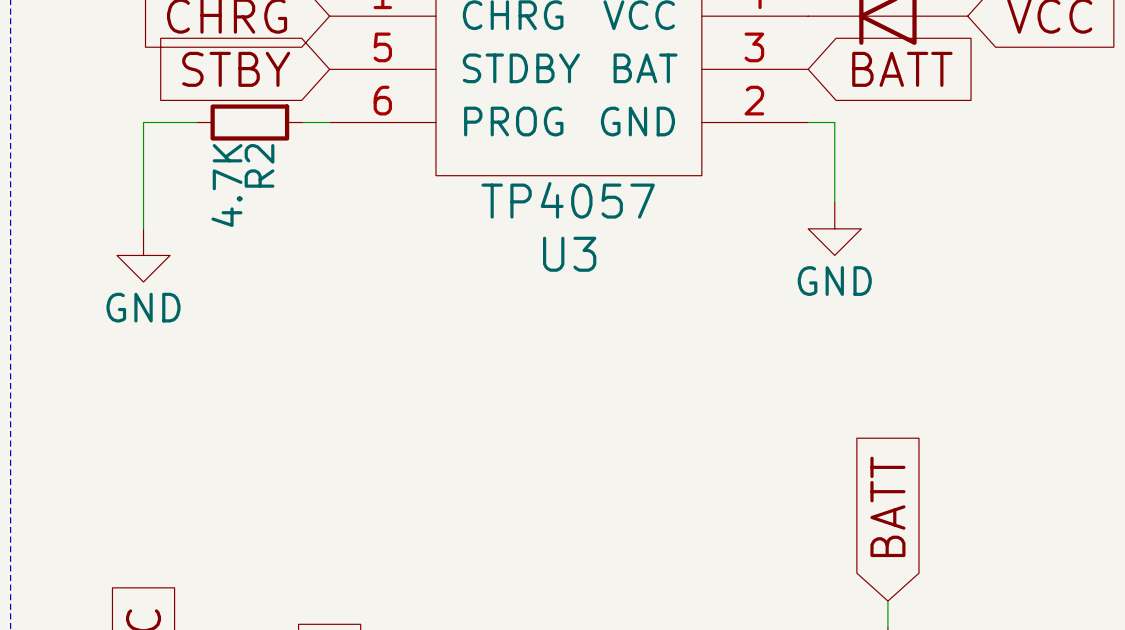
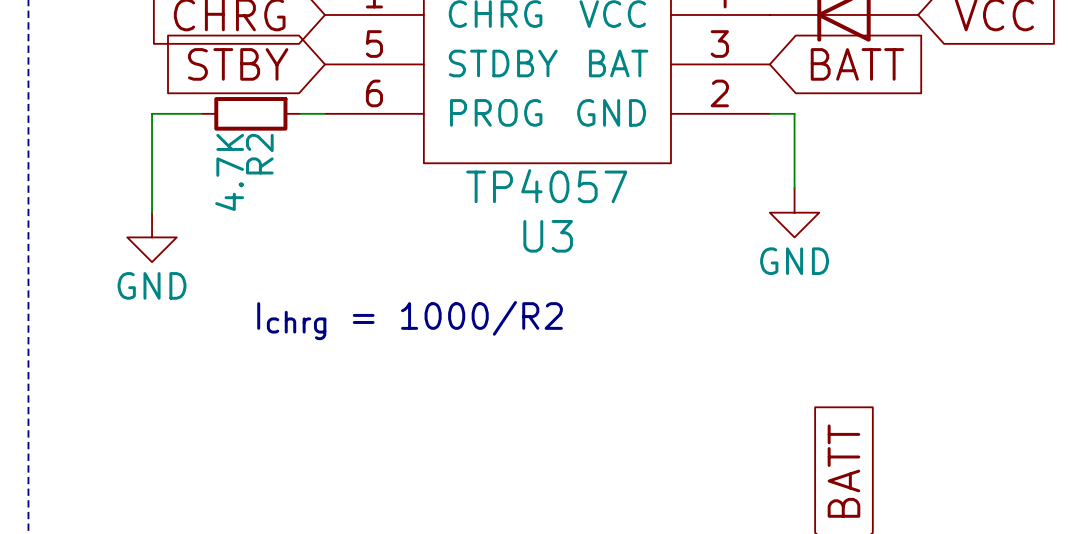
text: none -> Ichrg = 1000/R2 (410, 320)

